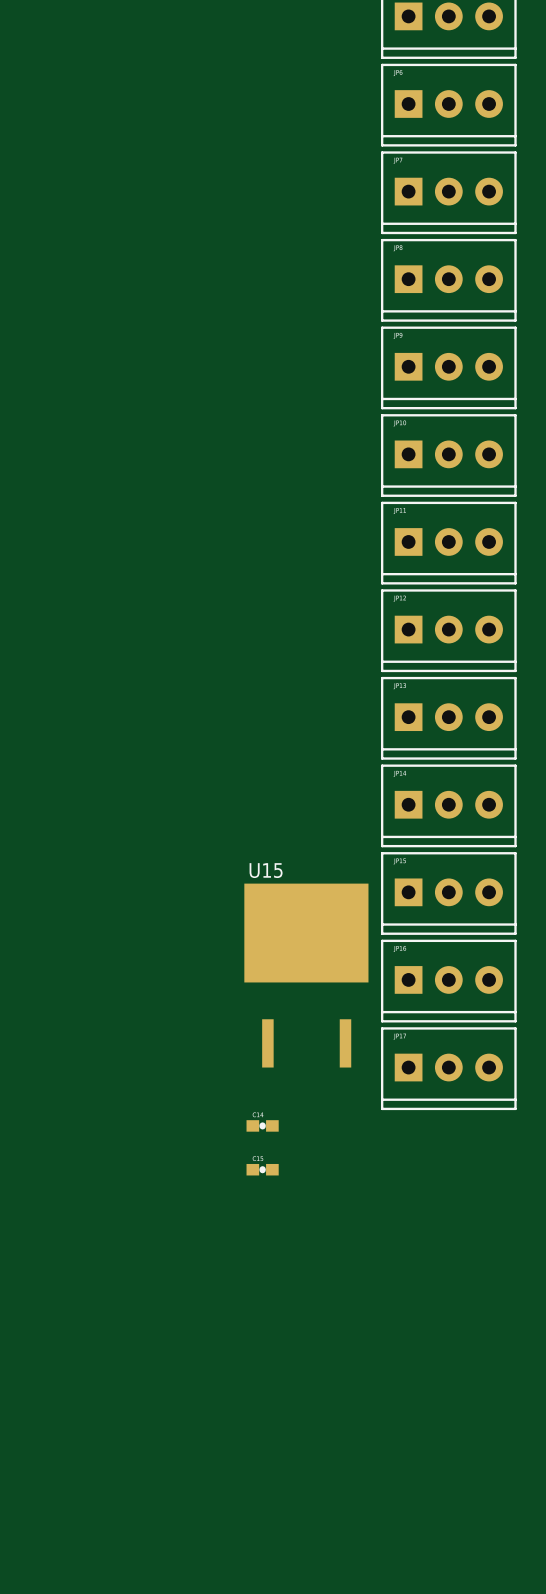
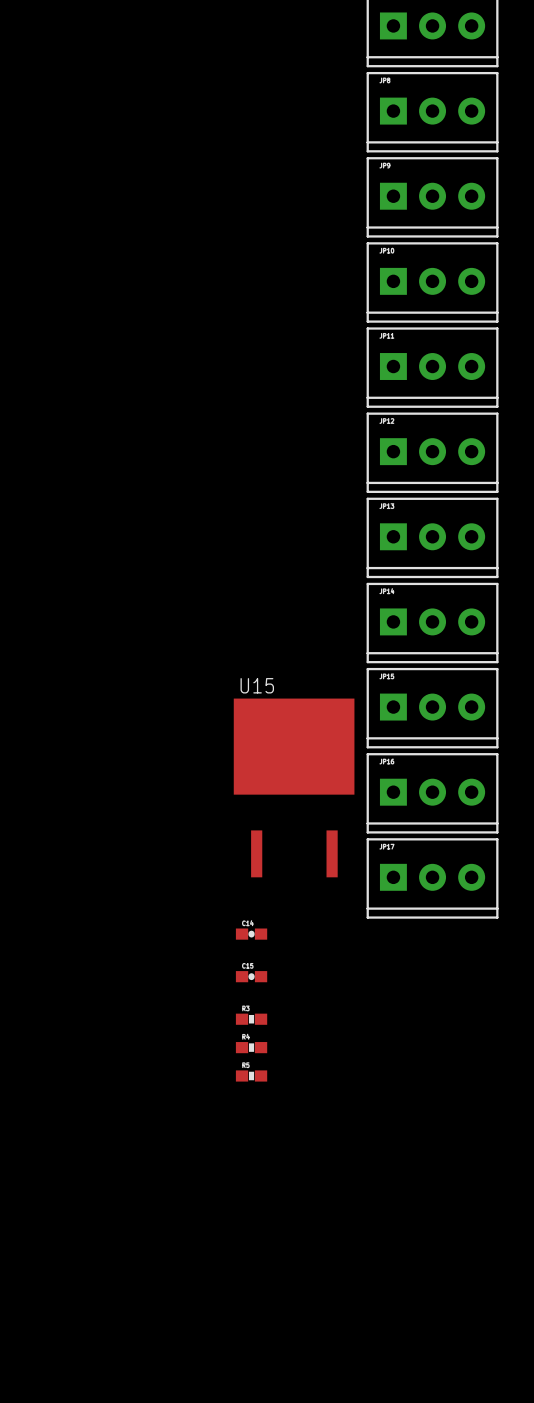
part: none -> (251, 1019)
part: none -> (251, 1047)
part: none -> (251, 1075)

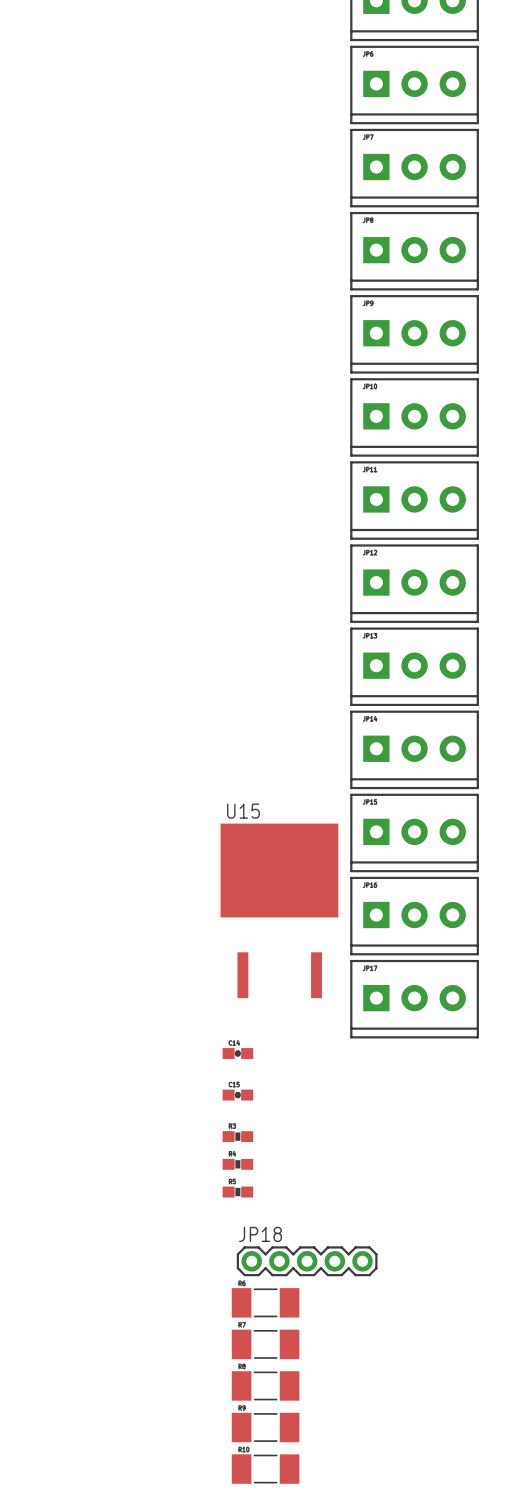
JP18: none -> (307, 1261)
part: none -> (265, 1302)
part: none -> (265, 1344)
part: none -> (265, 1385)
part: none -> (265, 1427)
part: none -> (265, 1469)

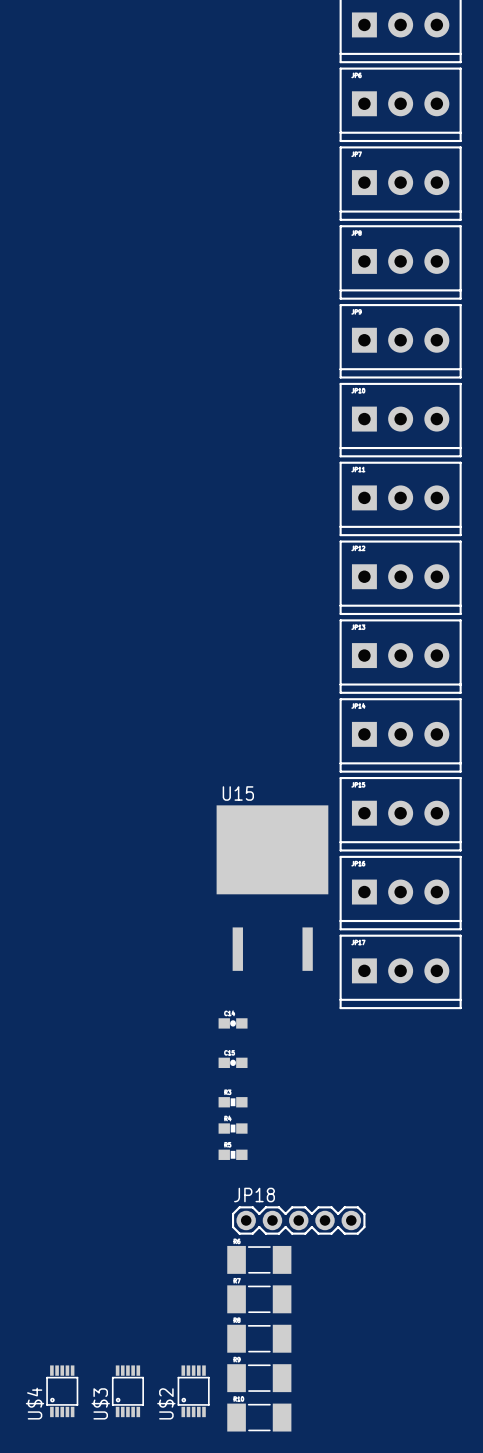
U$4: none -> (62, 1391)
U$3: none -> (127, 1391)
U$2: none -> (193, 1391)

